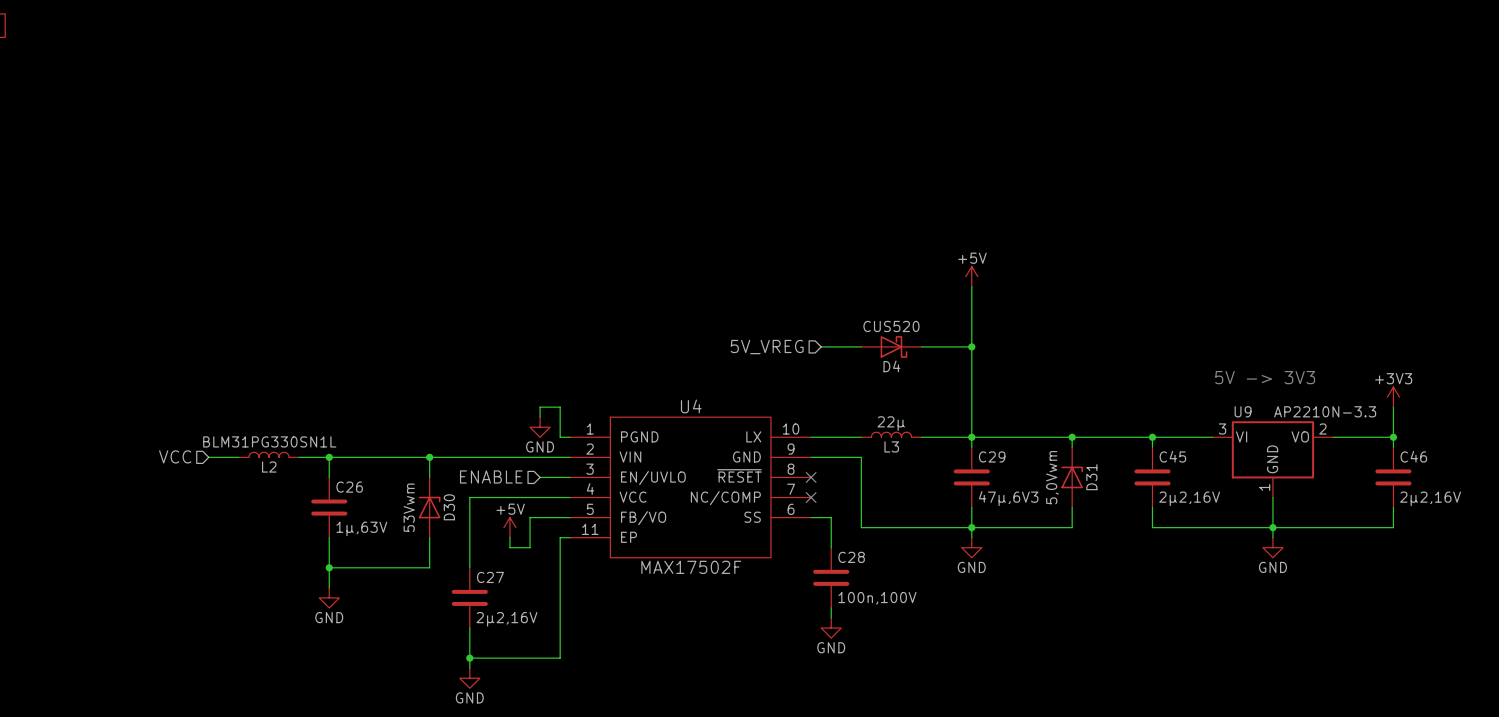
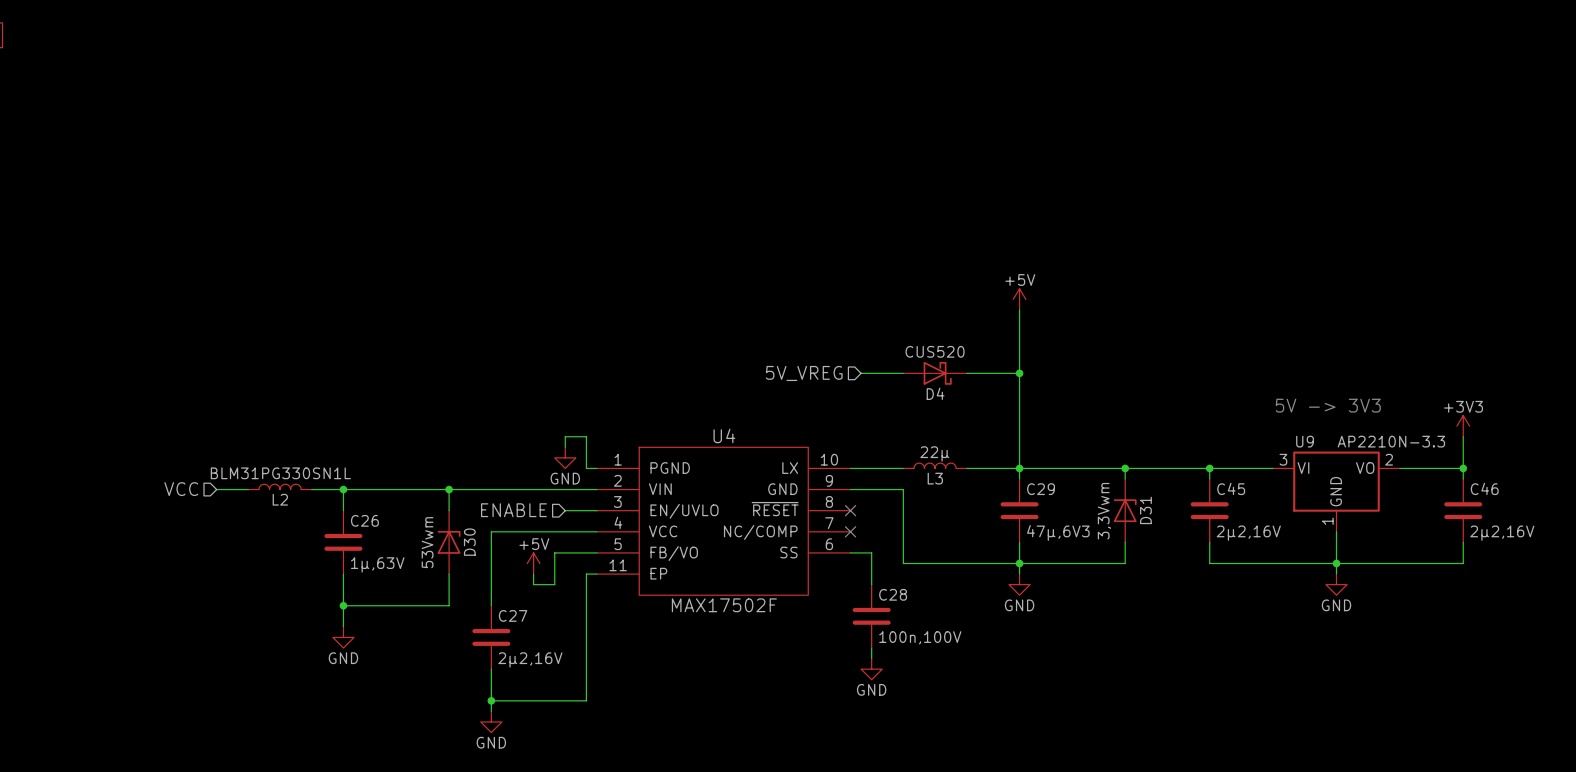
D31 value: 5,0Vwm (1052, 477) -> 3,3Vwm (1104, 511)

